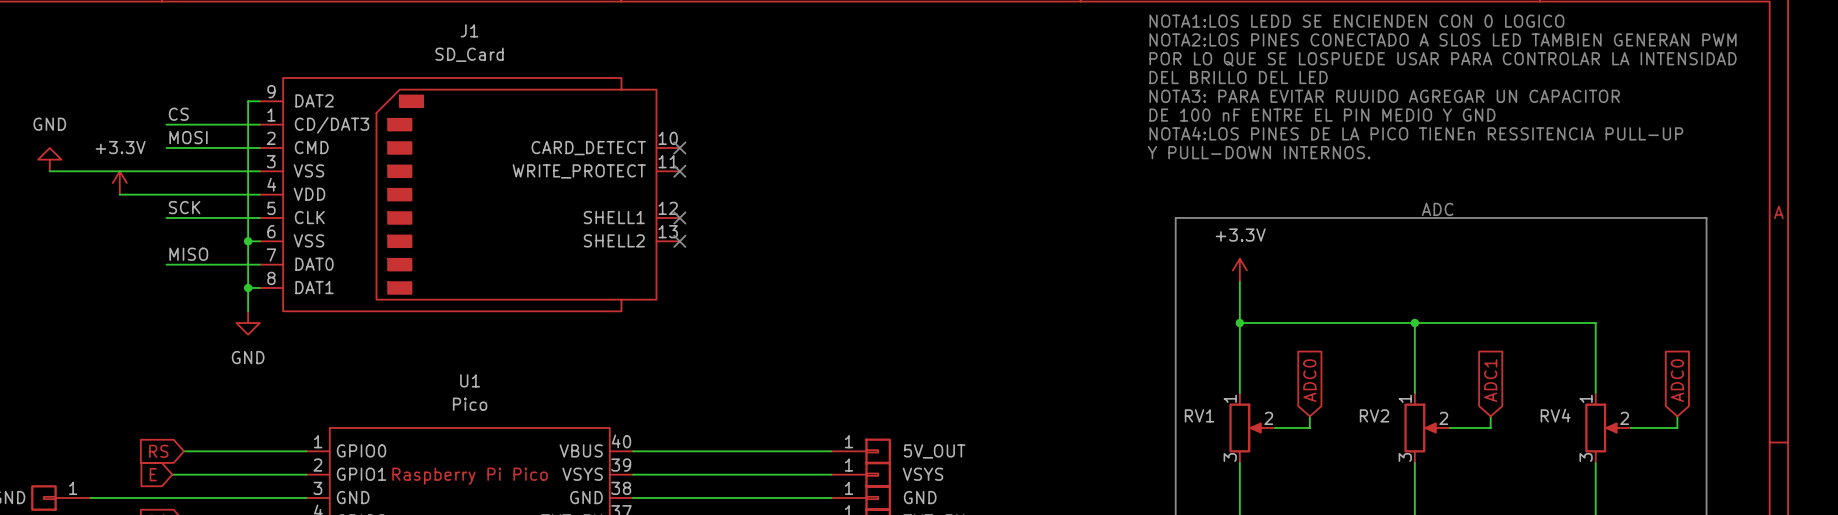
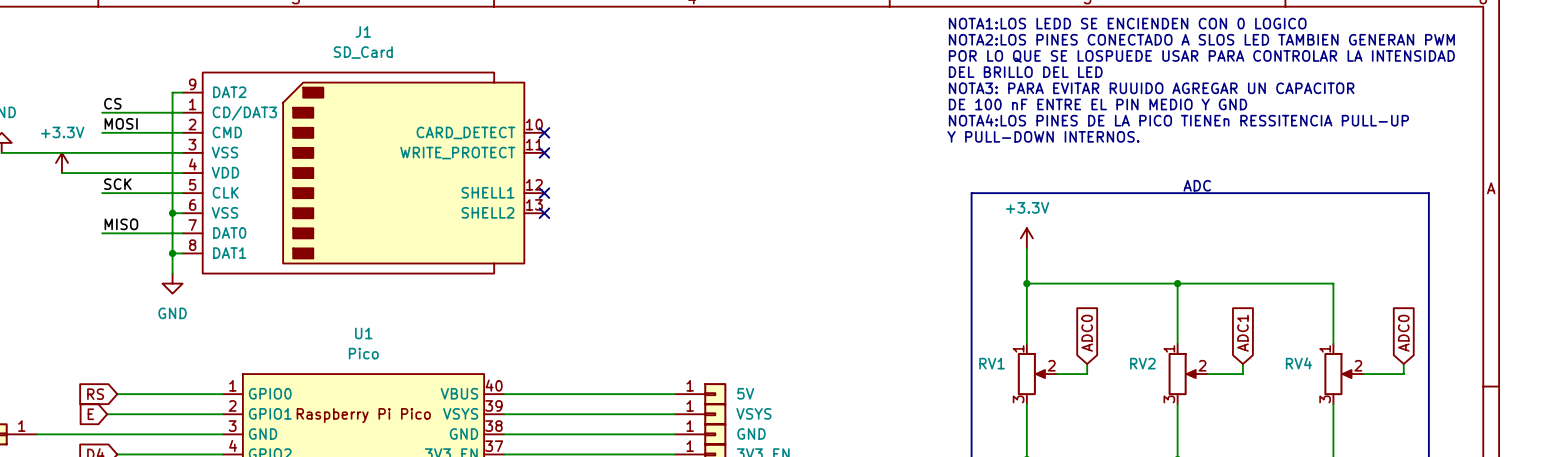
part value: 5V_OUT (934, 451) -> 5V (745, 393)

